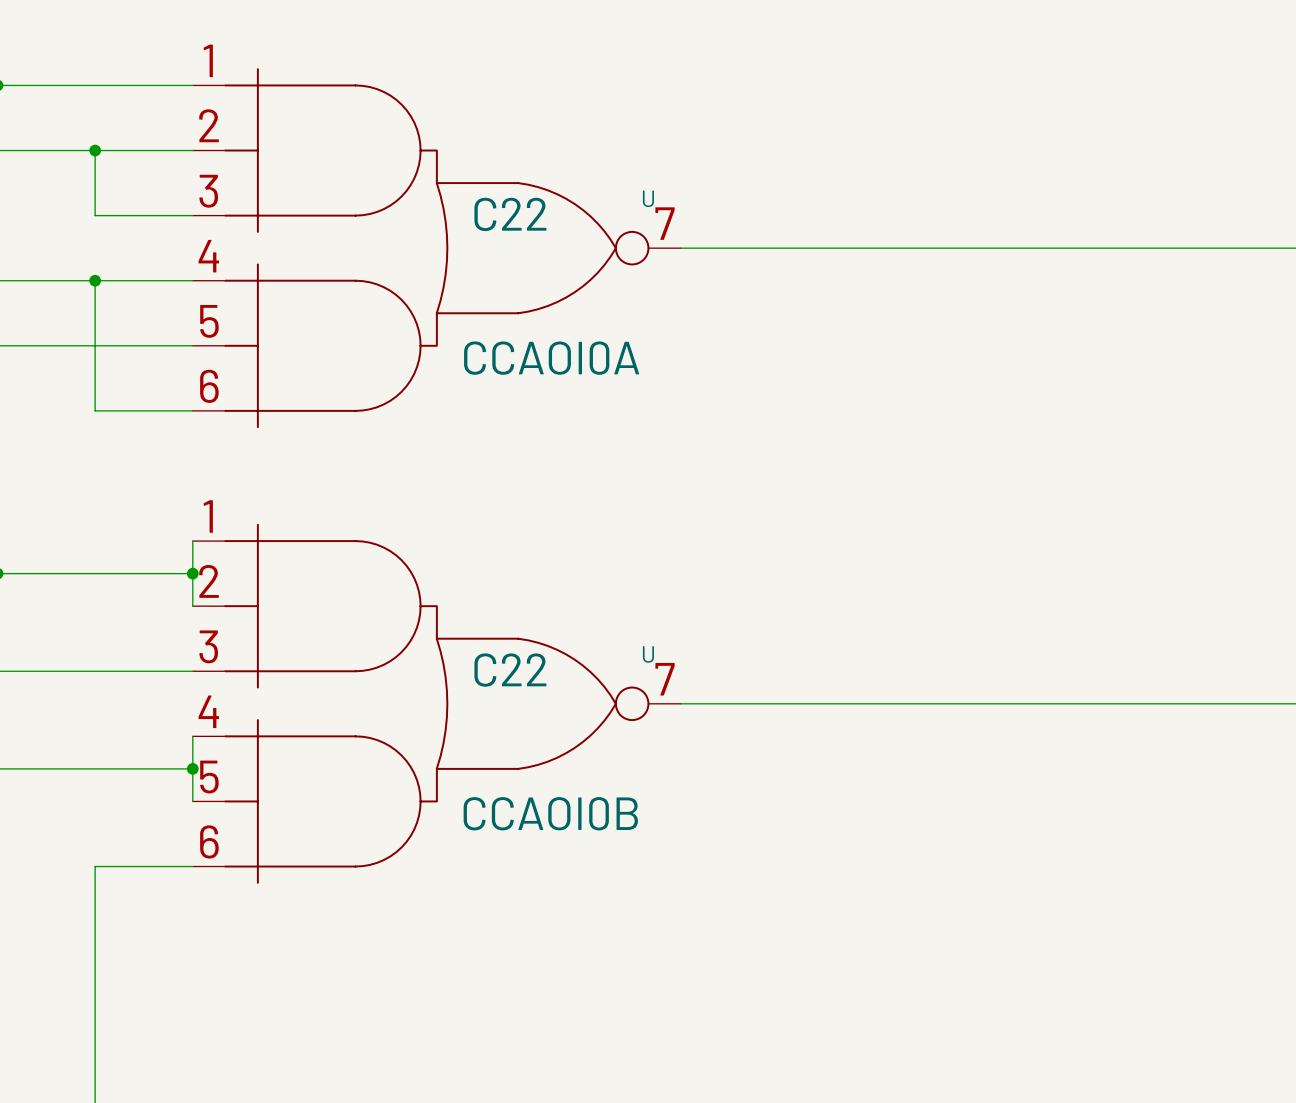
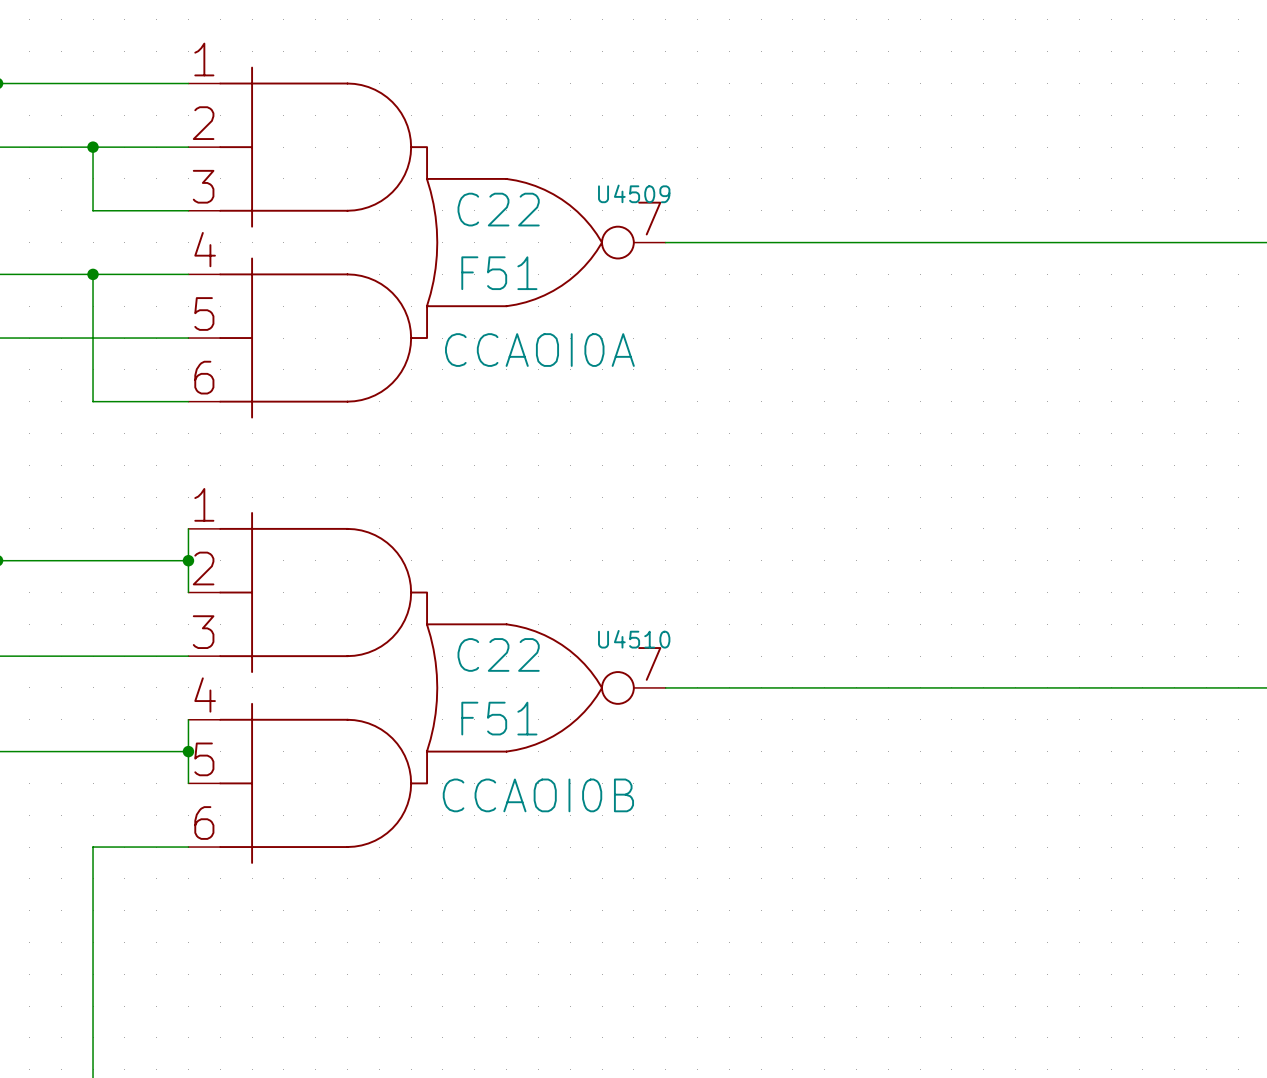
U name: U (648, 198) -> U4509 (634, 193)
U value: none -> F51 (499, 273)
U name: U (648, 654) -> U4510 (634, 639)
U value: none -> F51 (499, 718)

